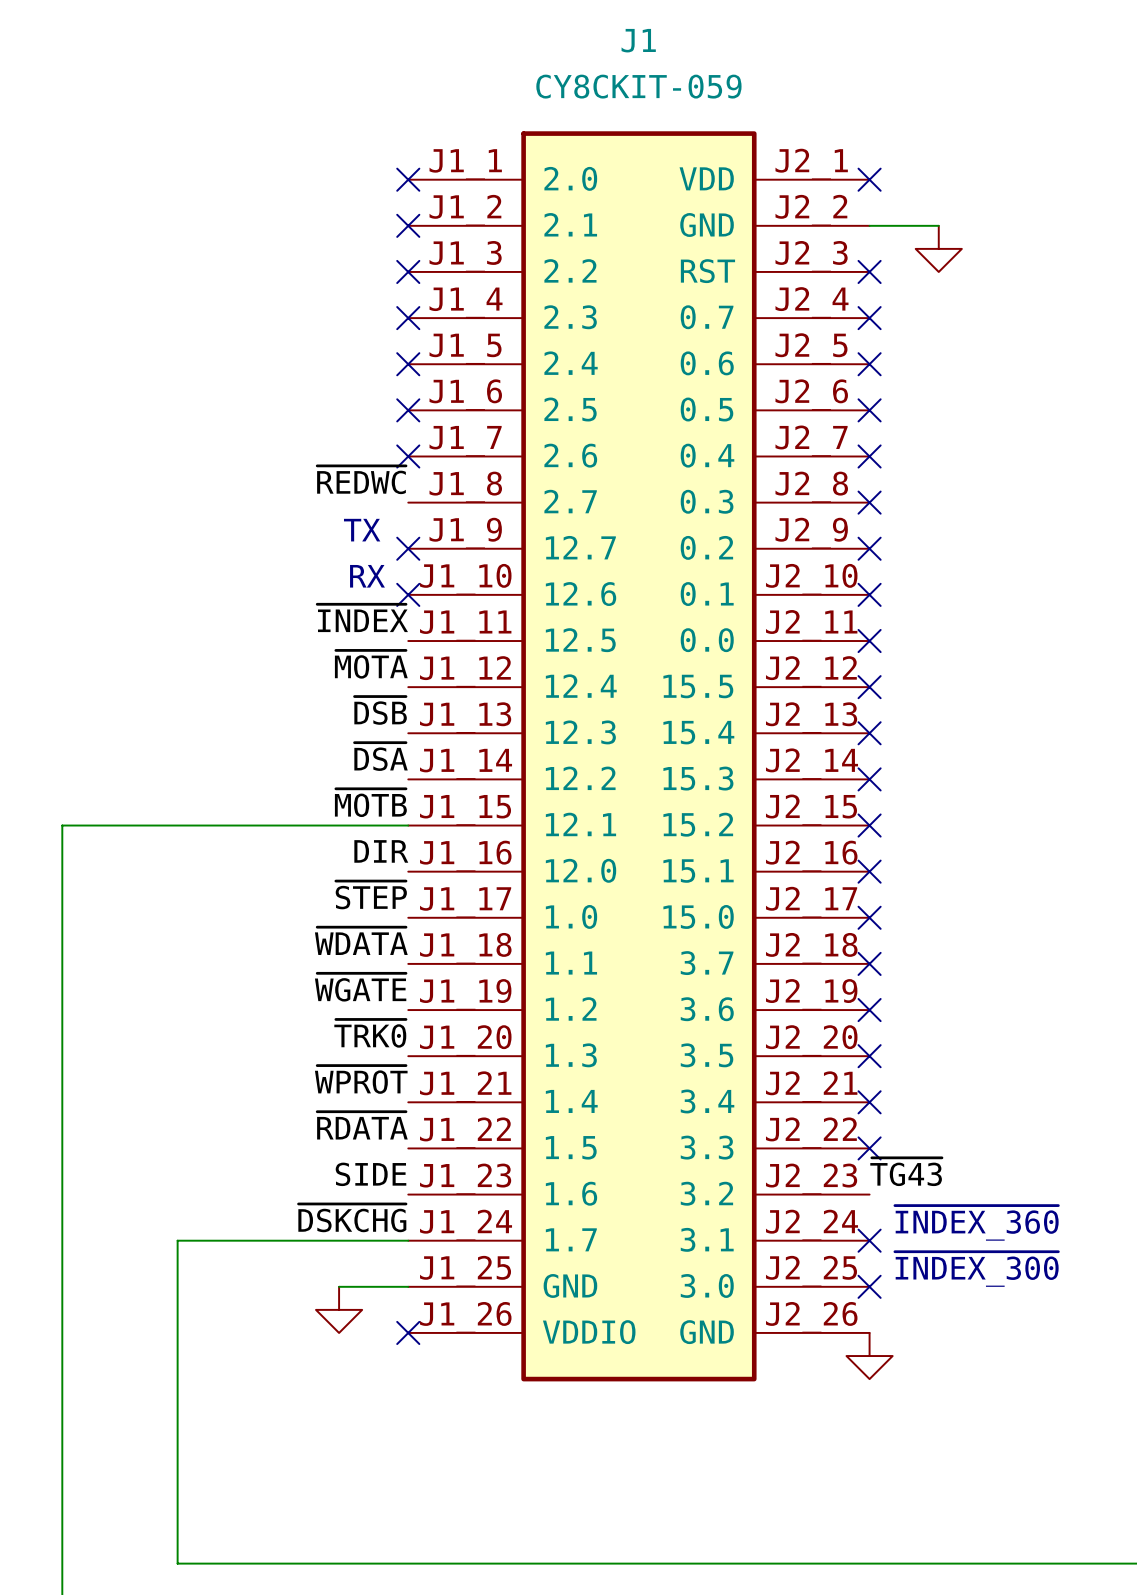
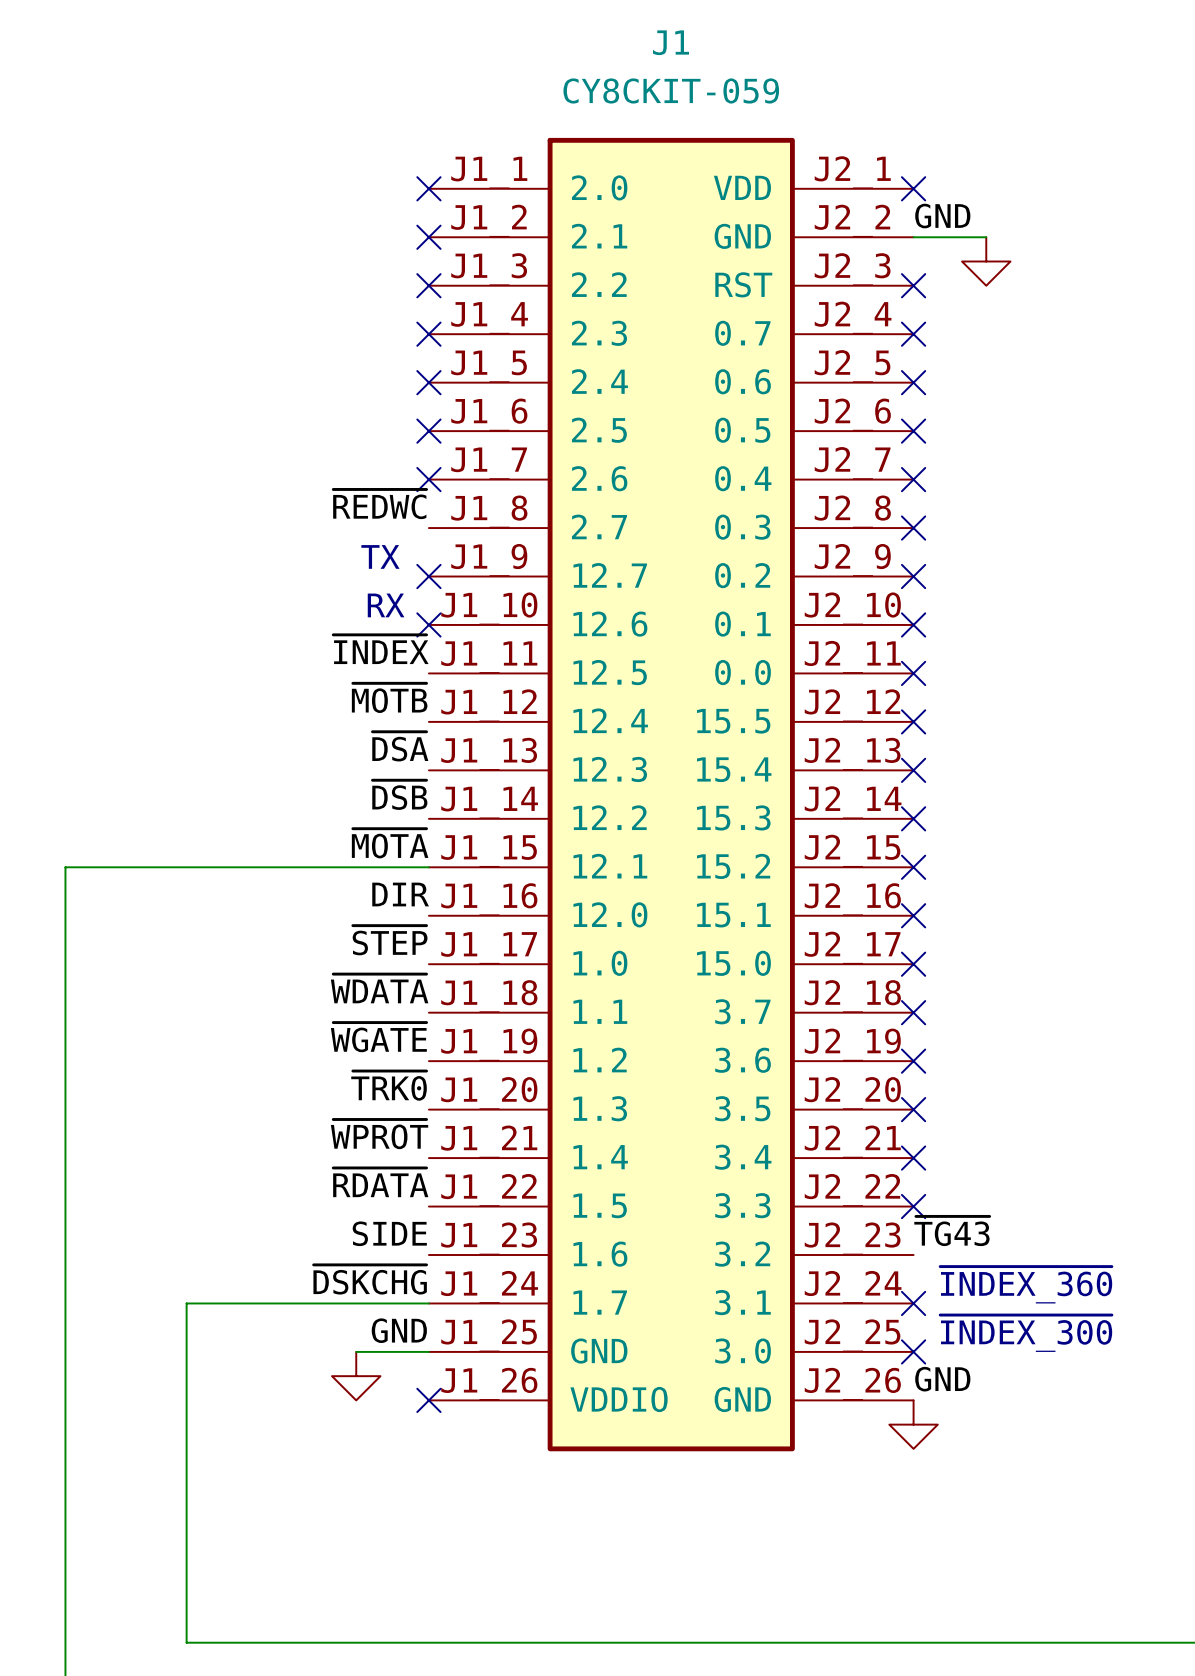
label: none -> GND (942, 216)
label: ~{MOTA} (371, 664) -> ~{MOTB} (389, 698)
label: ~{DSB} (380, 710) -> ~{DSA} (400, 746)
label: ~{DSA} (381, 756) -> ~{DSB} (399, 795)
label: ~{MOTB} (370, 802) -> ~{MOTA} (390, 843)
label: none -> GND (399, 1330)
label: none -> GND (942, 1379)

